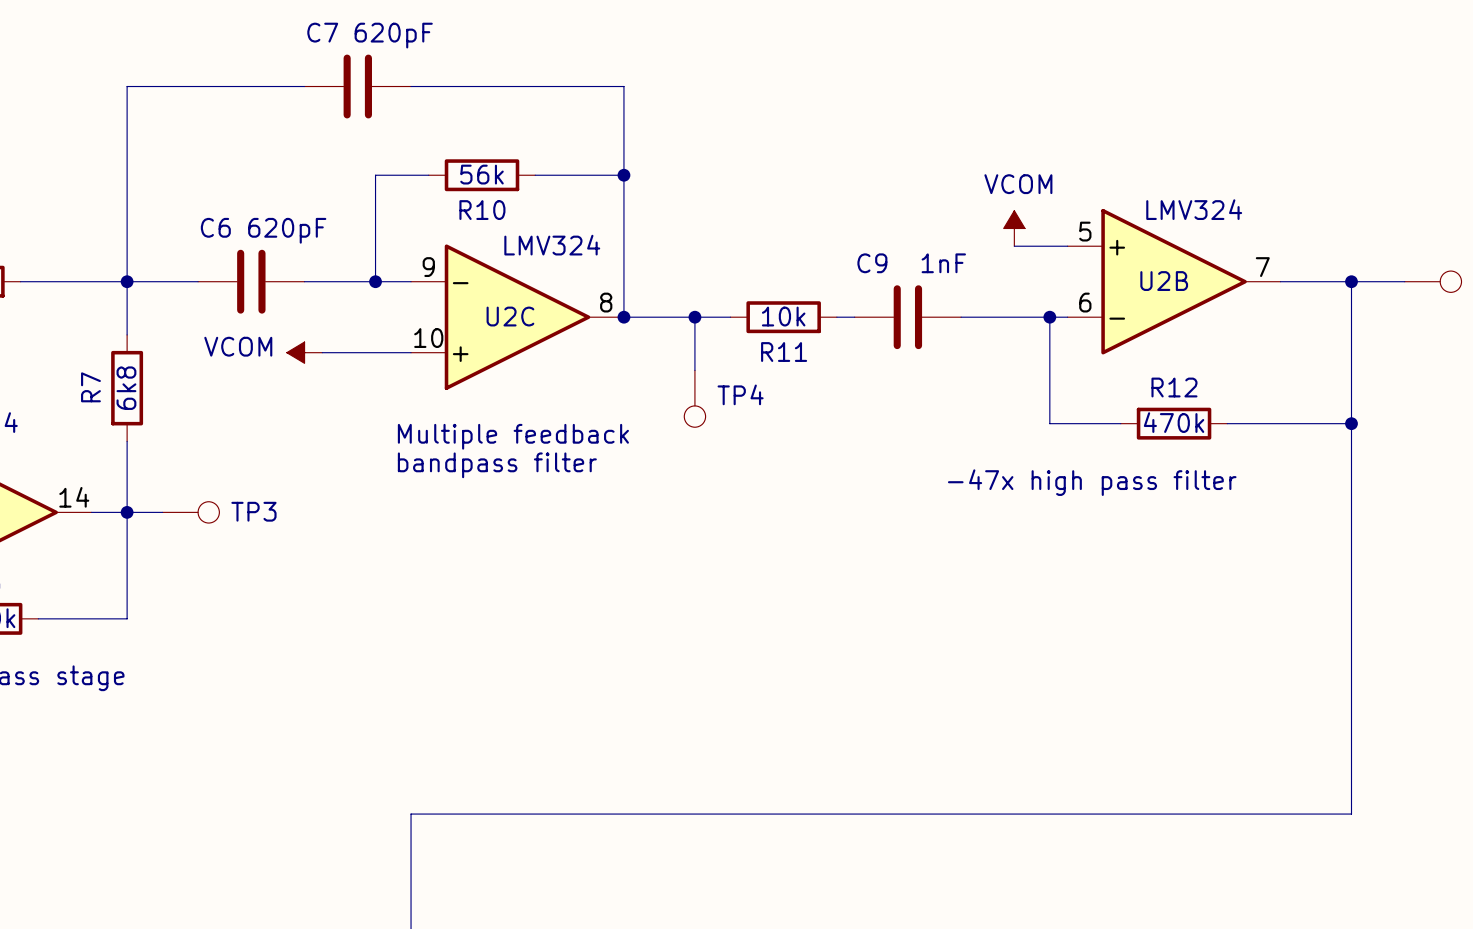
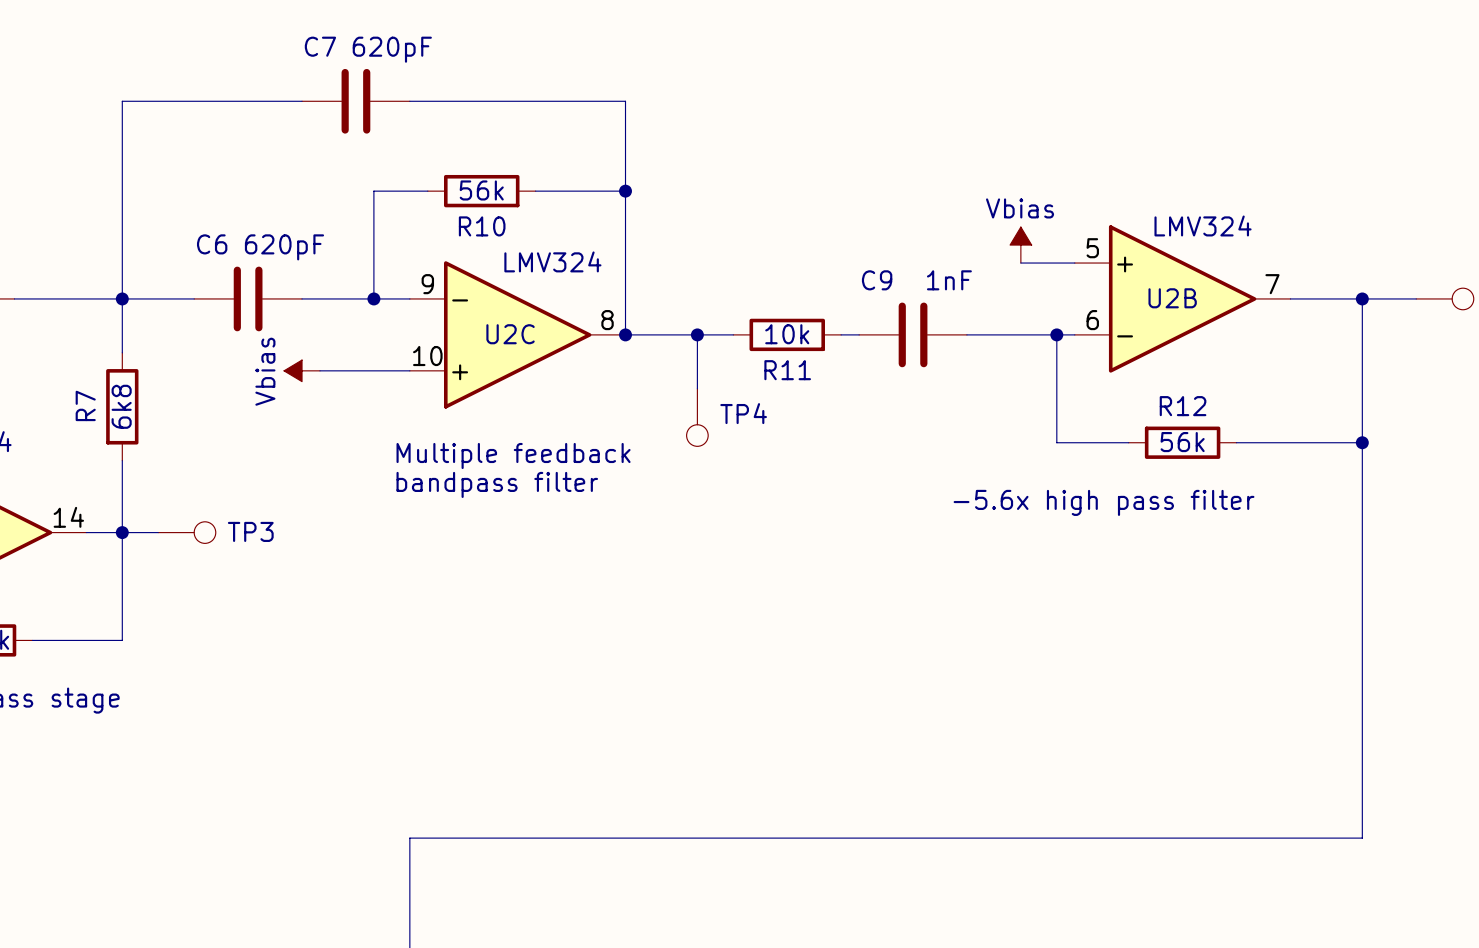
power symbol: VCOM (1014, 228) -> Vbias (1020, 245)
power symbol: VCOM (304, 352) -> Vbias (302, 370)
R12 value: 470k (1174, 422) -> 56k (1182, 442)
text: -47x high pass filter (1092, 482) -> -5.6x high pass filter (1104, 502)

